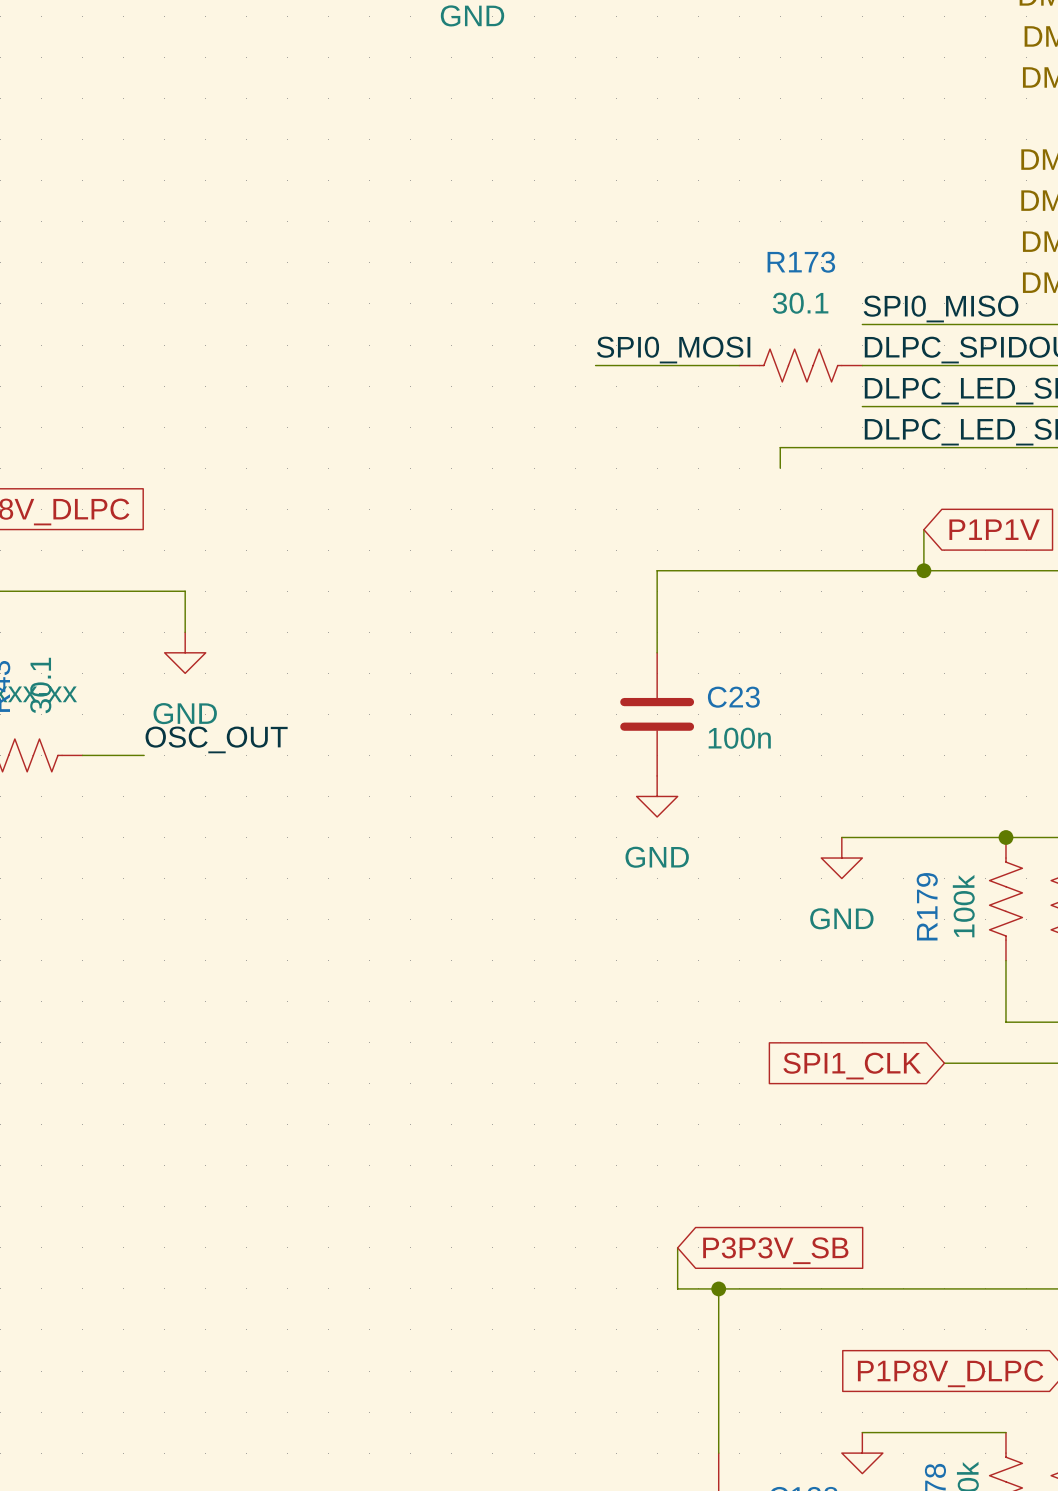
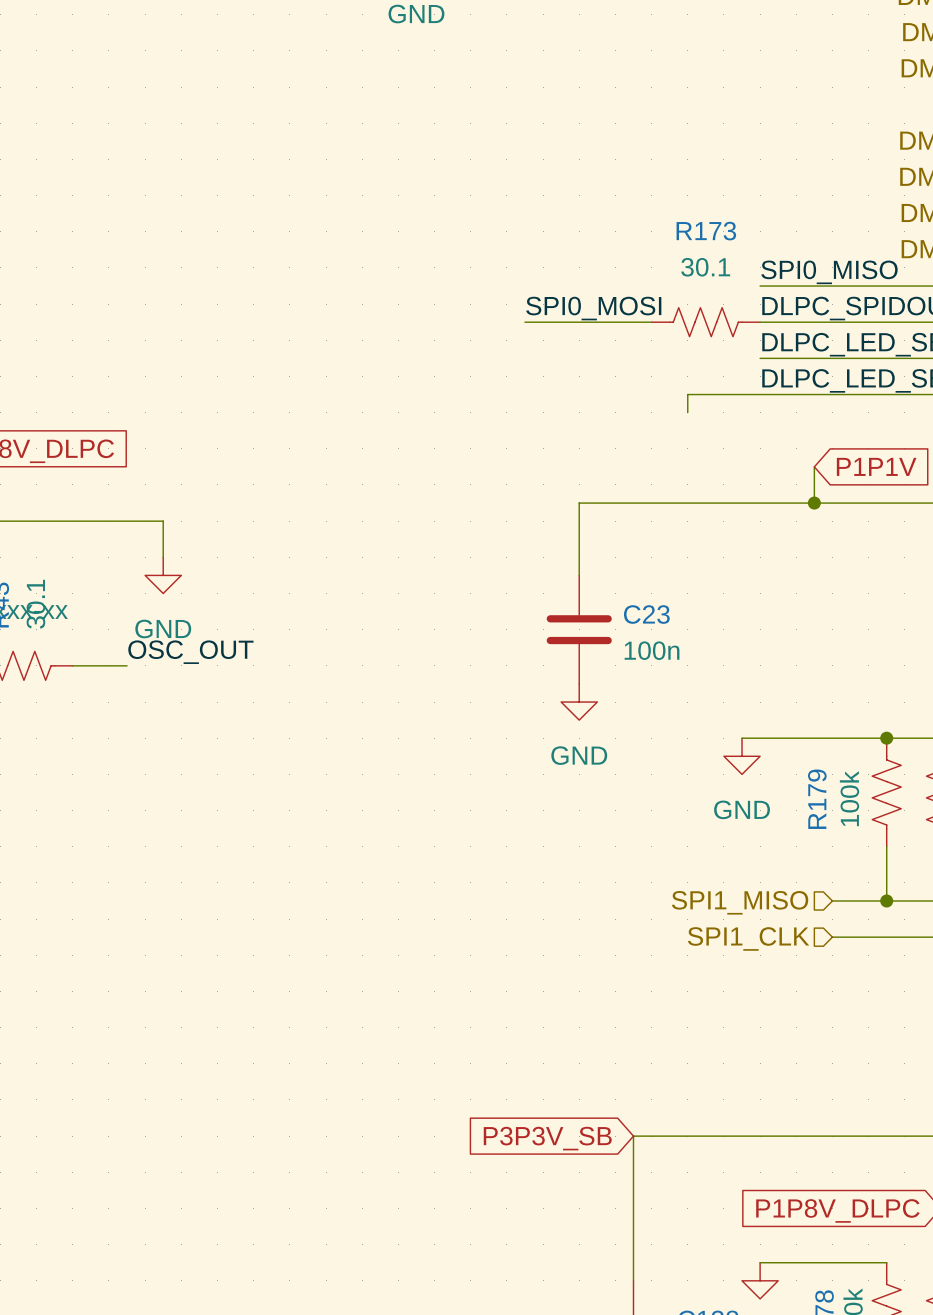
wire: none -> (832, 900) (886, 900)
junction: none -> (886, 900)
hierarchical label: none -> SPI1_MISO (740, 902)
hierarchical label: none -> SPI1_CLK (748, 938)
global label: SPI1_CLK (852, 1066) -> none
wire: (677, 1247) (677, 1288) (718, 1288) -> none
global label rotation: 0° (775, 1250) -> 180° (547, 1138)
junction: (718, 1288) -> none

